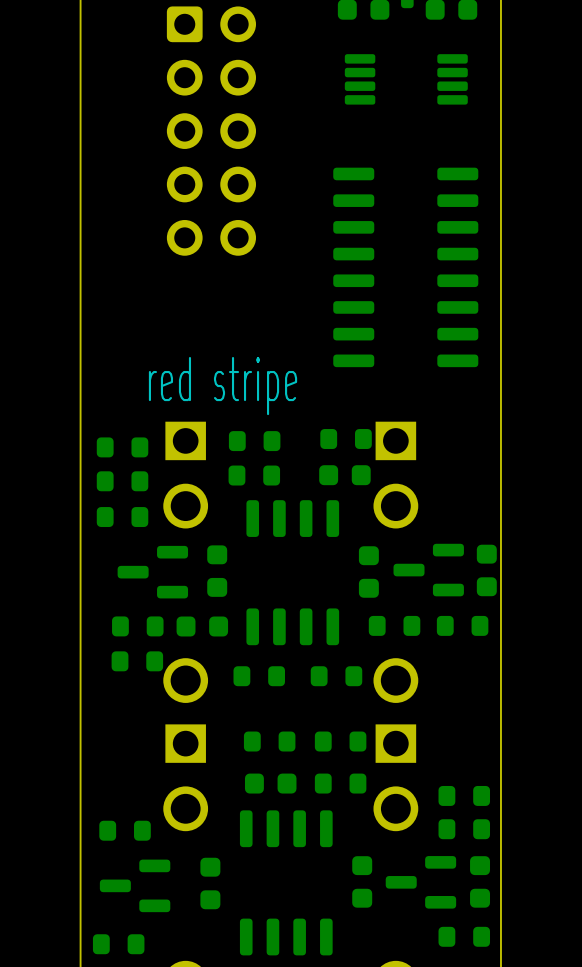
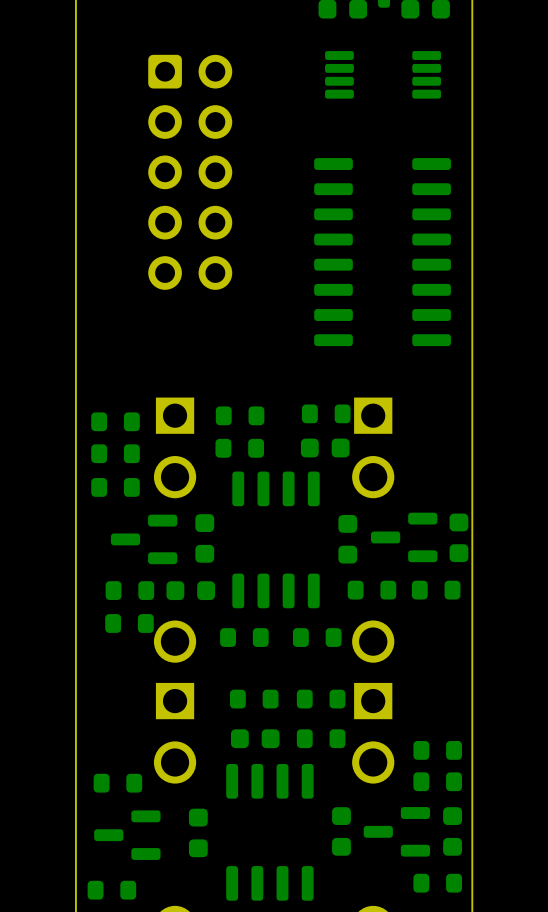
part position: (211, 131) -> (190, 172)
text: red stripe (223, 386) -> none

